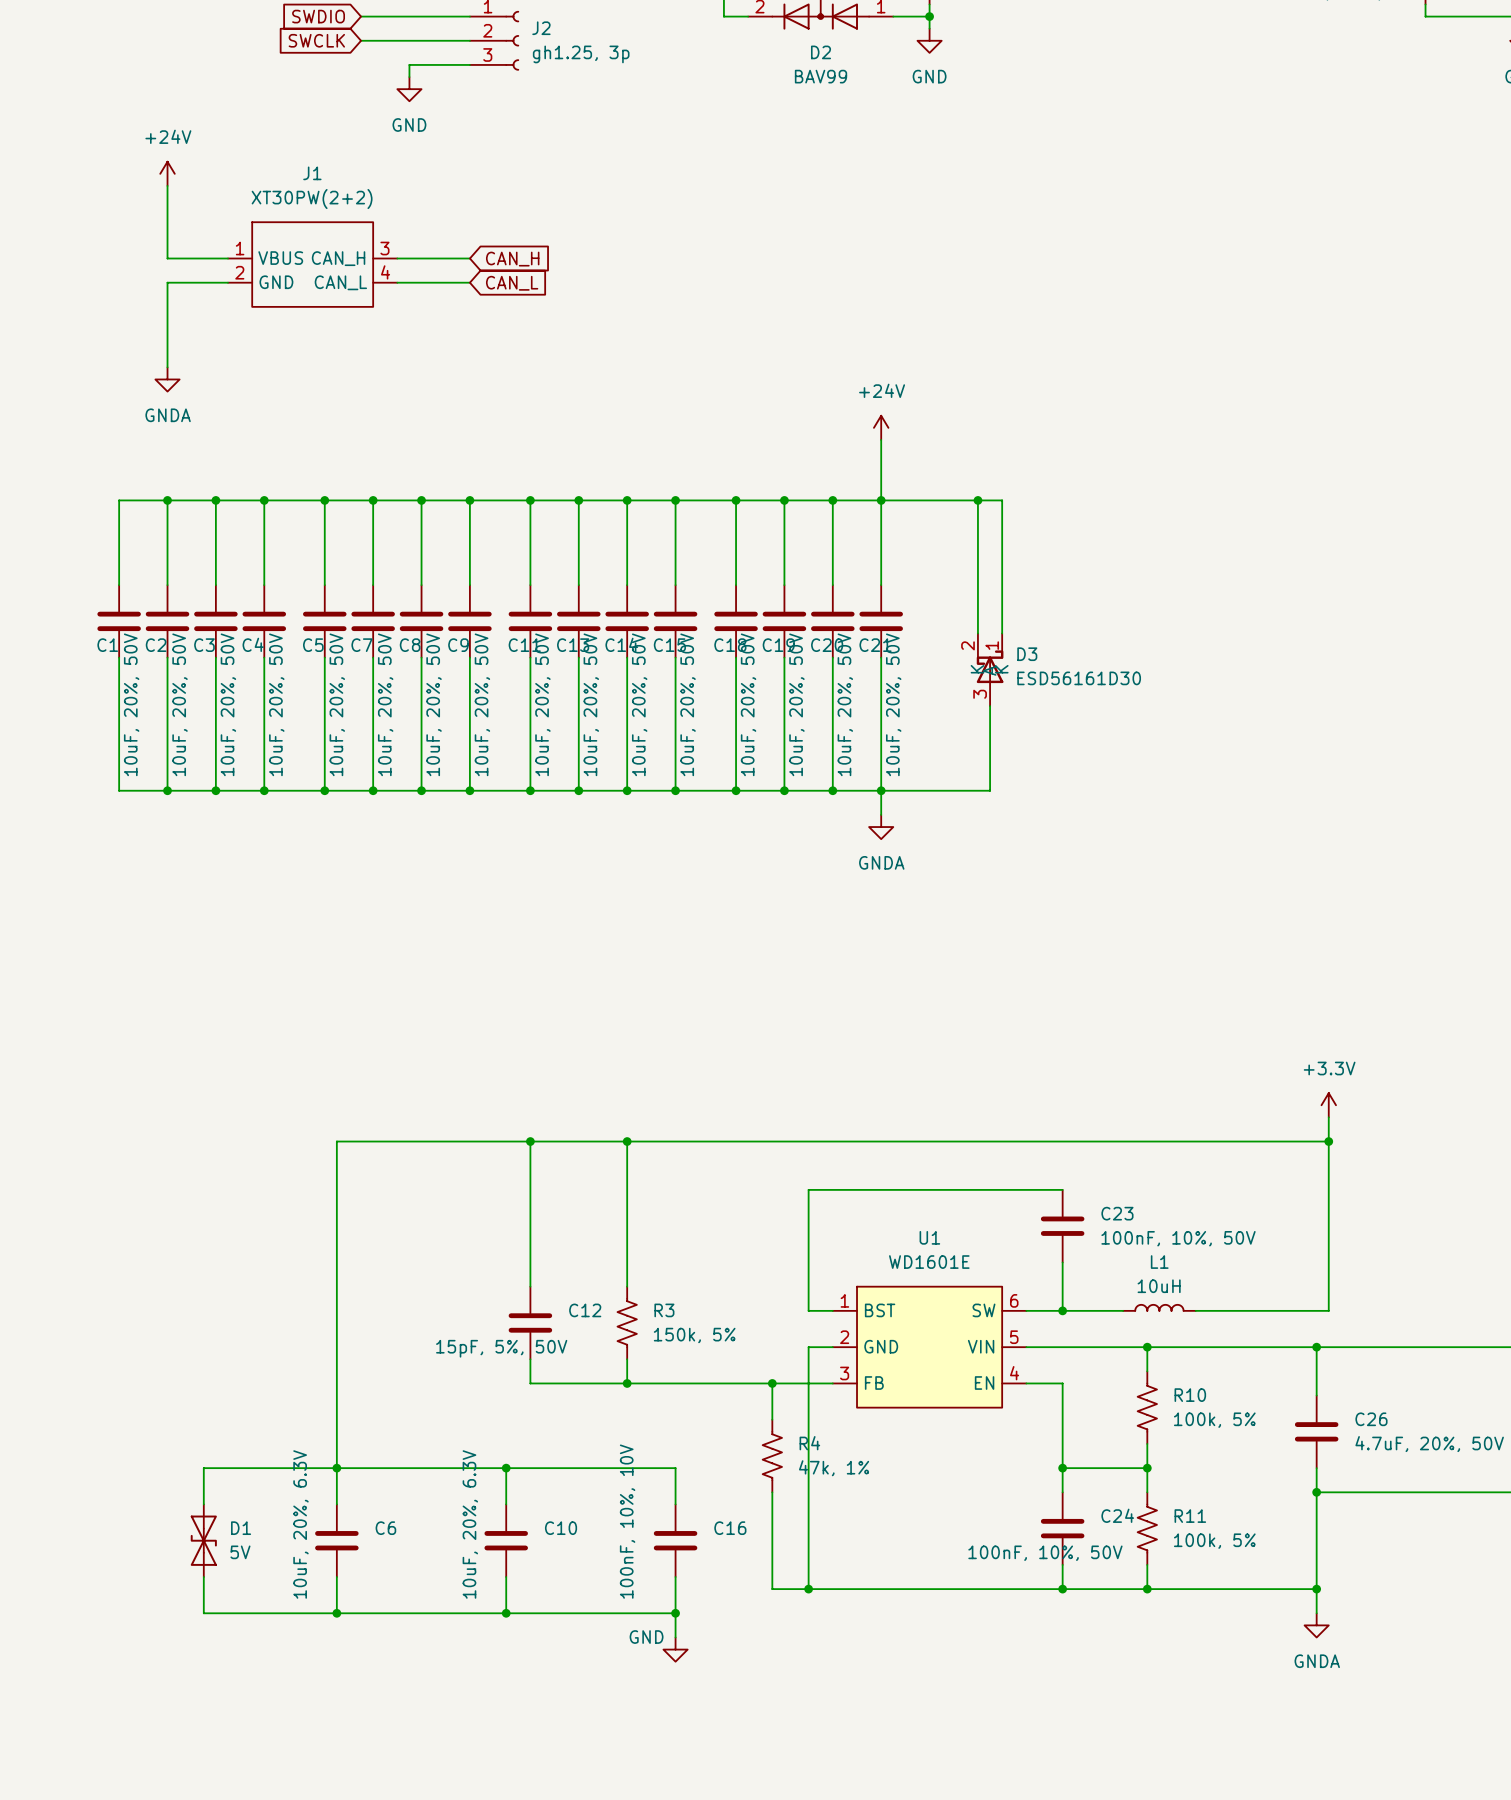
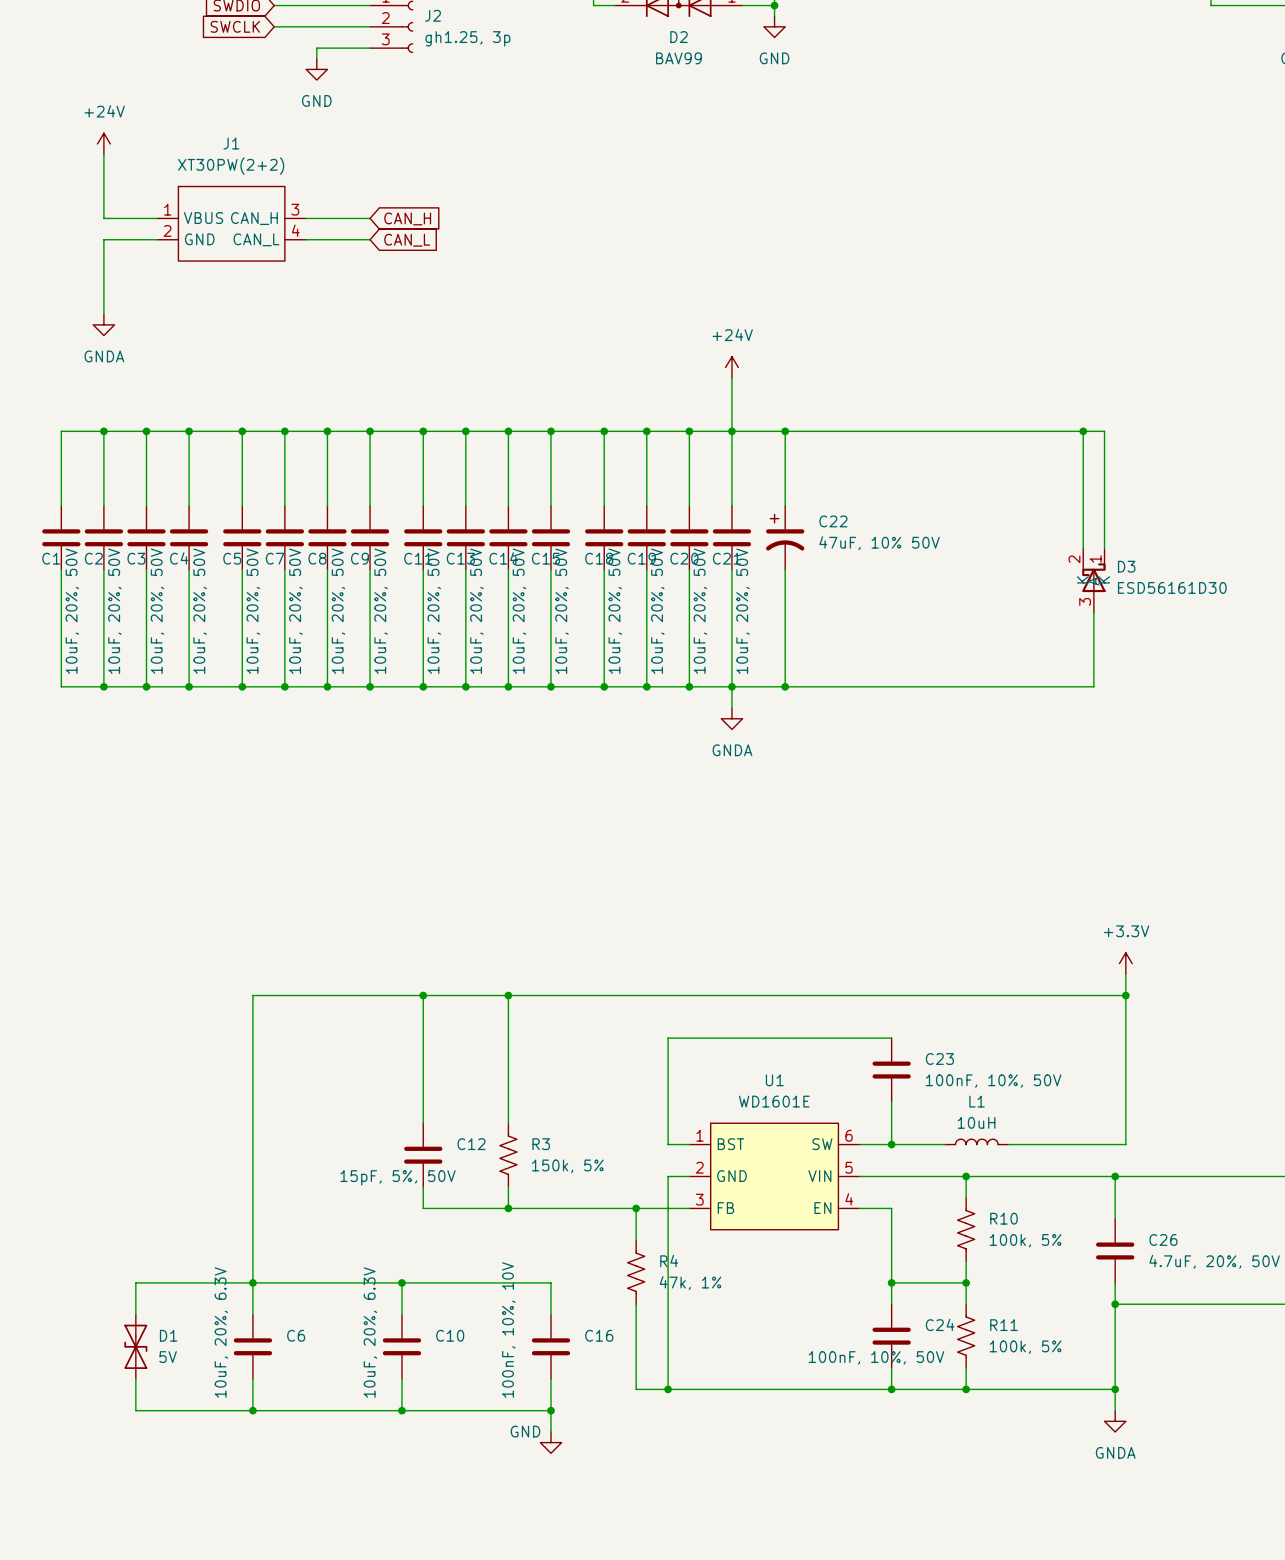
wire: none -> (785, 431) (785, 505)
wire: (977, 500) (977, 633) -> (785, 569) (785, 686)
junction position: (977, 500) -> (785, 431)
wire: (1002, 500) (1002, 633) -> (838, 431) (1104, 431) (1104, 548)
wire: none -> (1083, 431) (1083, 548)
junction: none -> (1083, 431)
C22: none -> 47uF, 10% 50V (785, 537)
D3 position: (990, 669) -> (1093, 580)
wire: (990, 706) (990, 790) -> (1093, 612) (1093, 686) (827, 686)
junction: none -> (785, 686)

